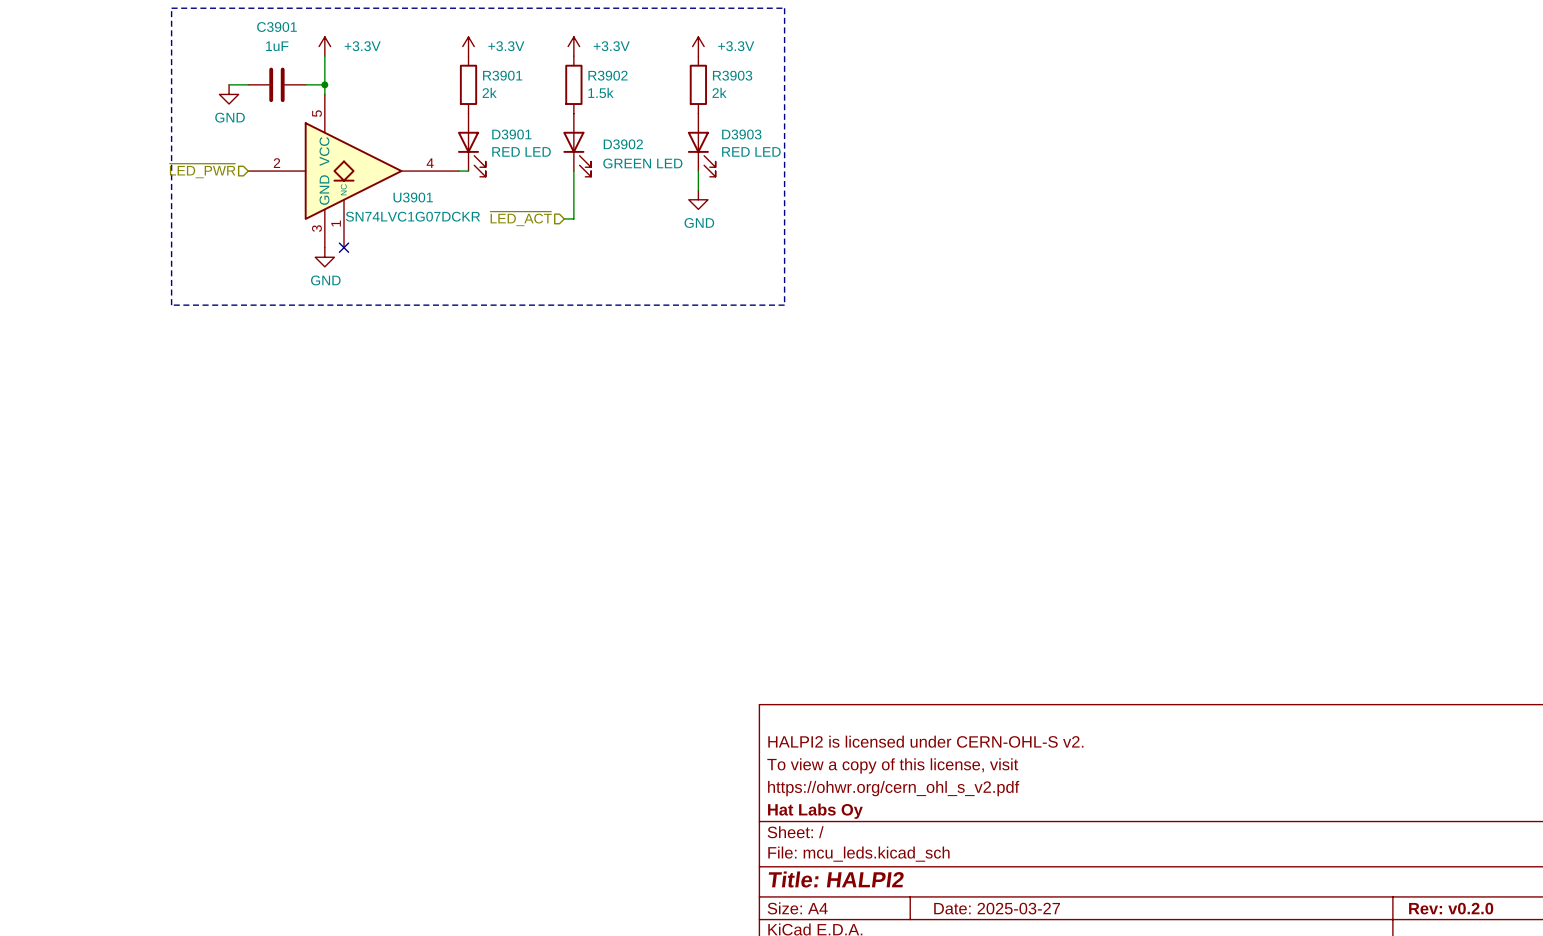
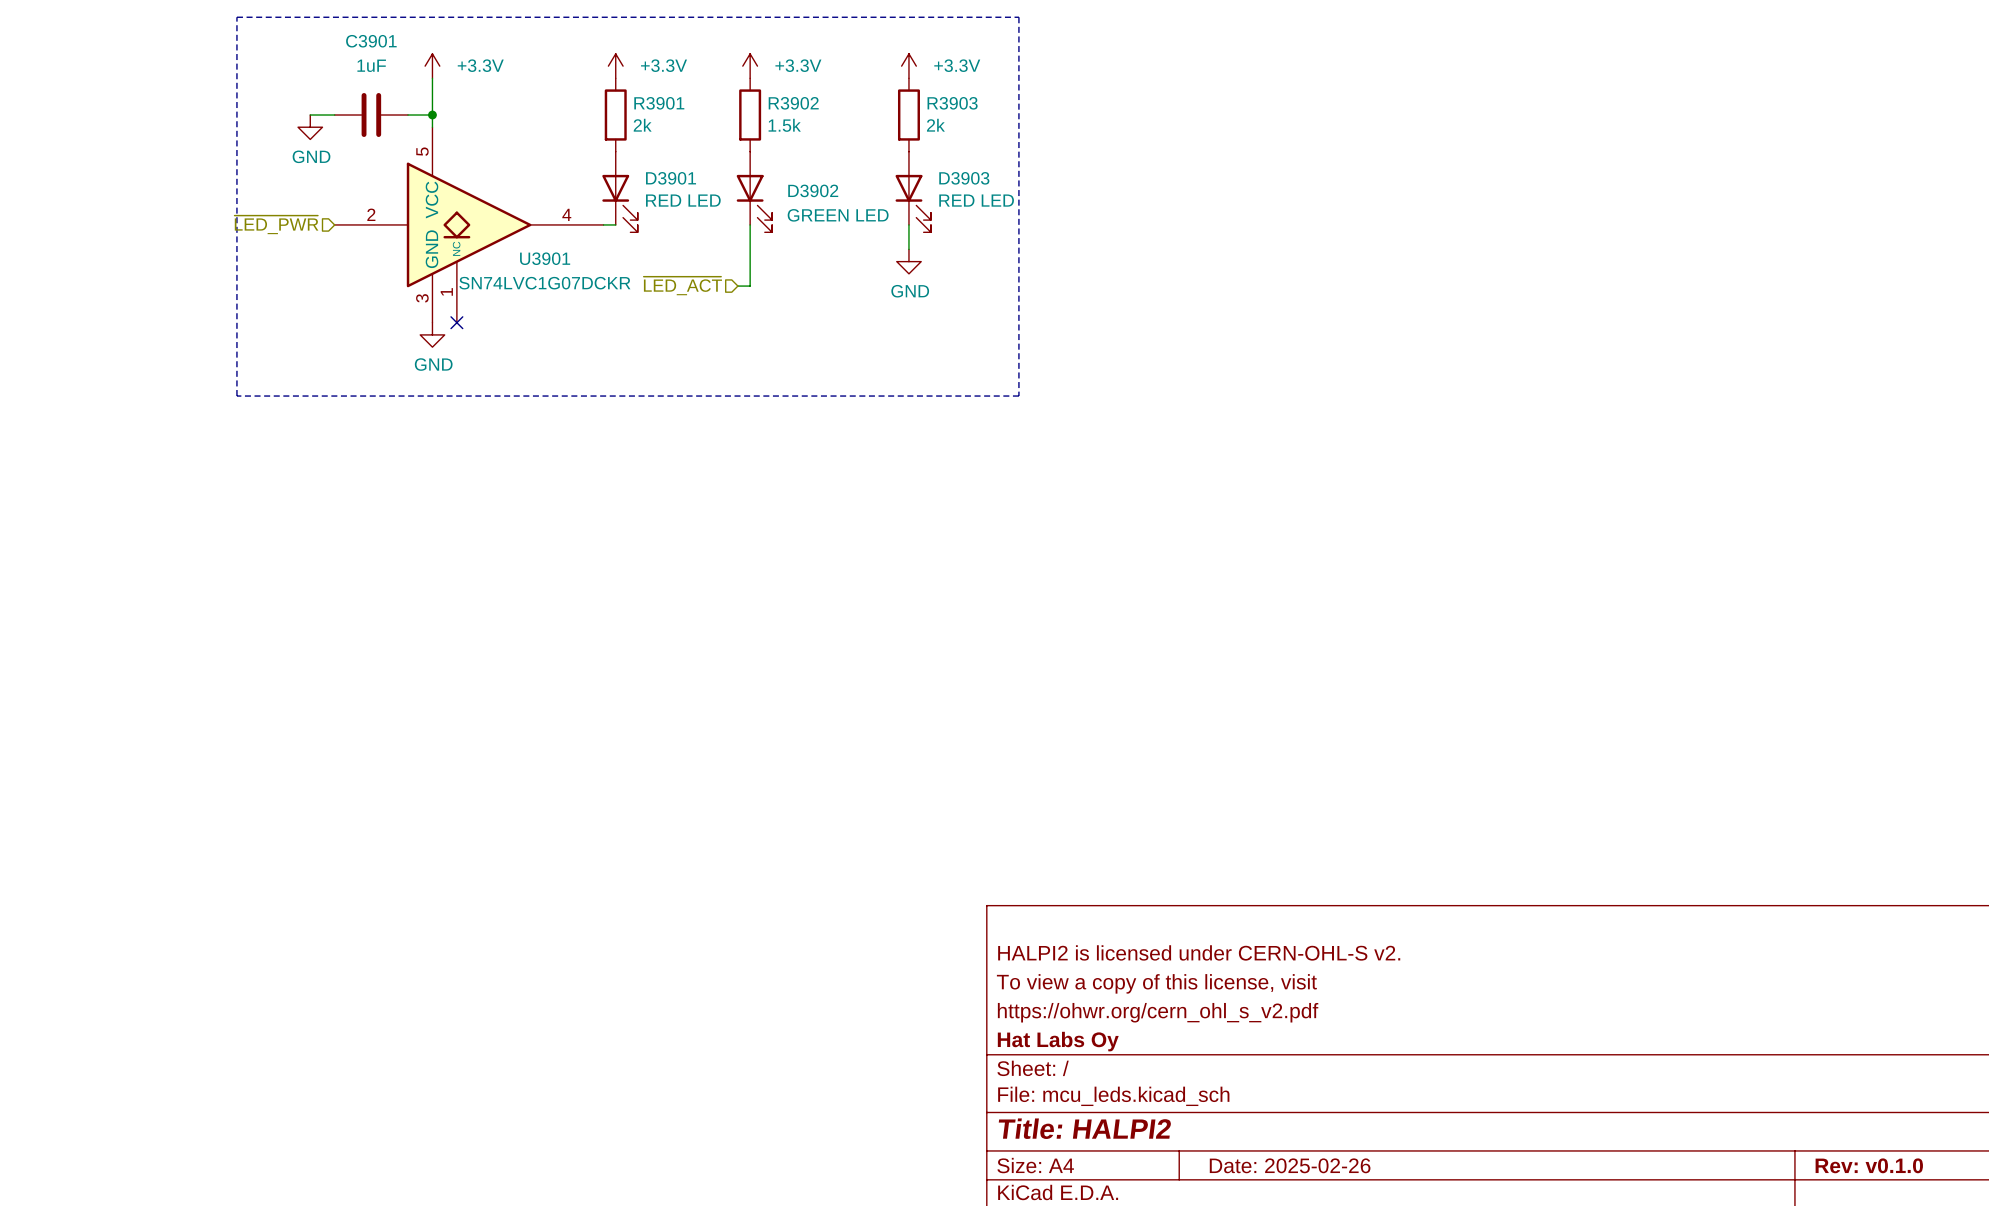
title block: Date: 2025-03-27 (997, 908) -> Date: 2025-02-26 (1290, 1165)
title block: Rev: v0.2.0 (1451, 908) -> Rev: v0.1.0 (1869, 1165)

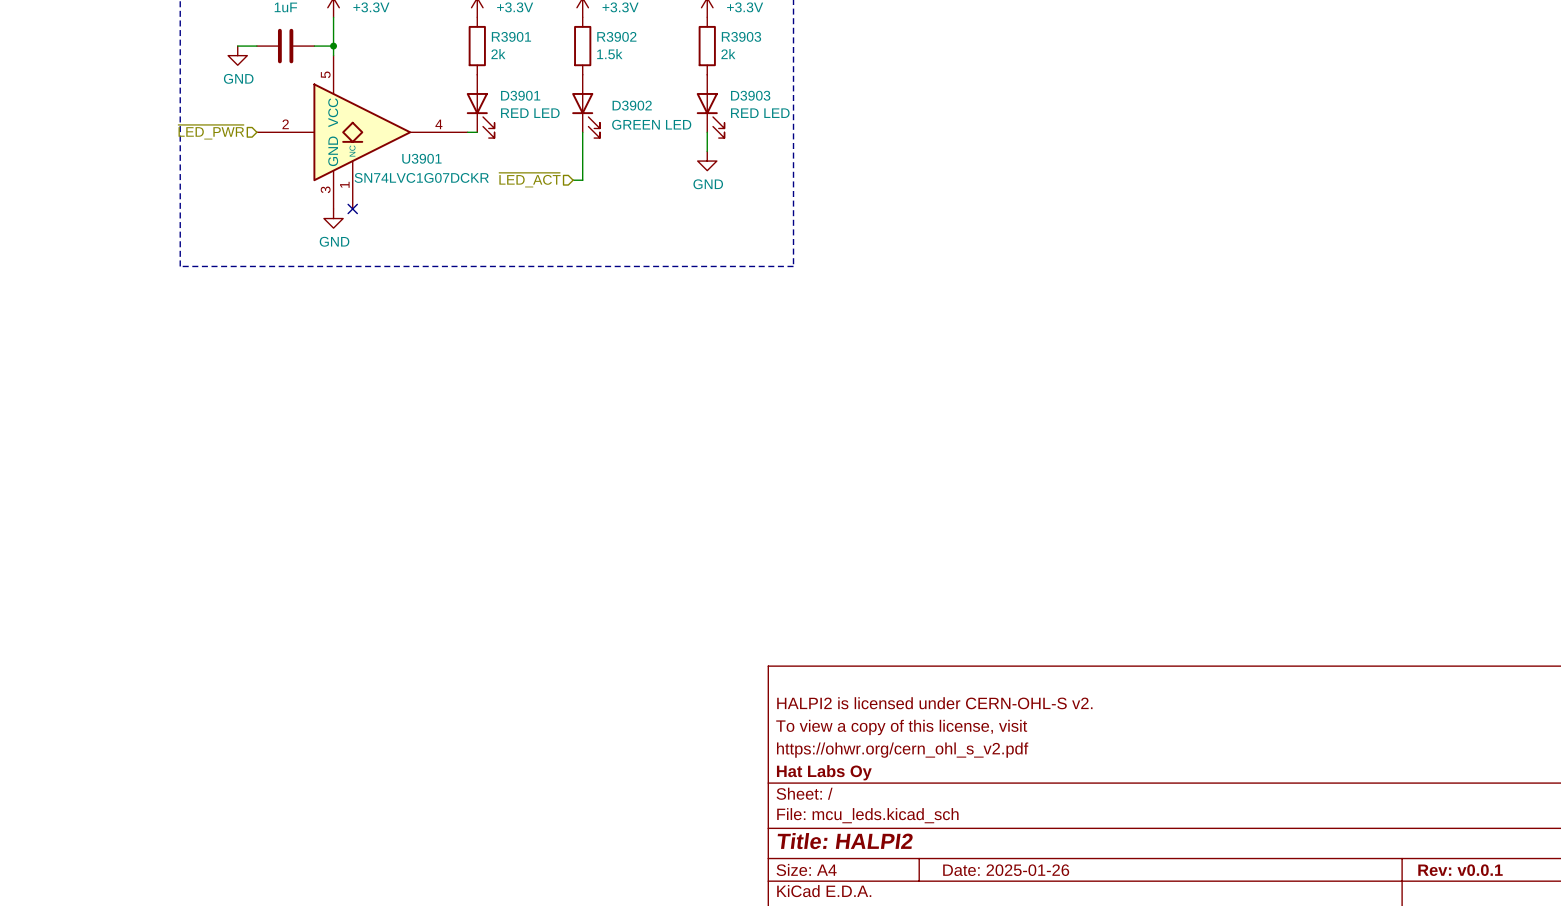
title block: Date: 2025-02-26 (1290, 1165) -> Date: 2025-01-26 (1006, 870)
title block: Rev: v0.1.0 (1869, 1165) -> Rev: v0.0.1 (1460, 870)

